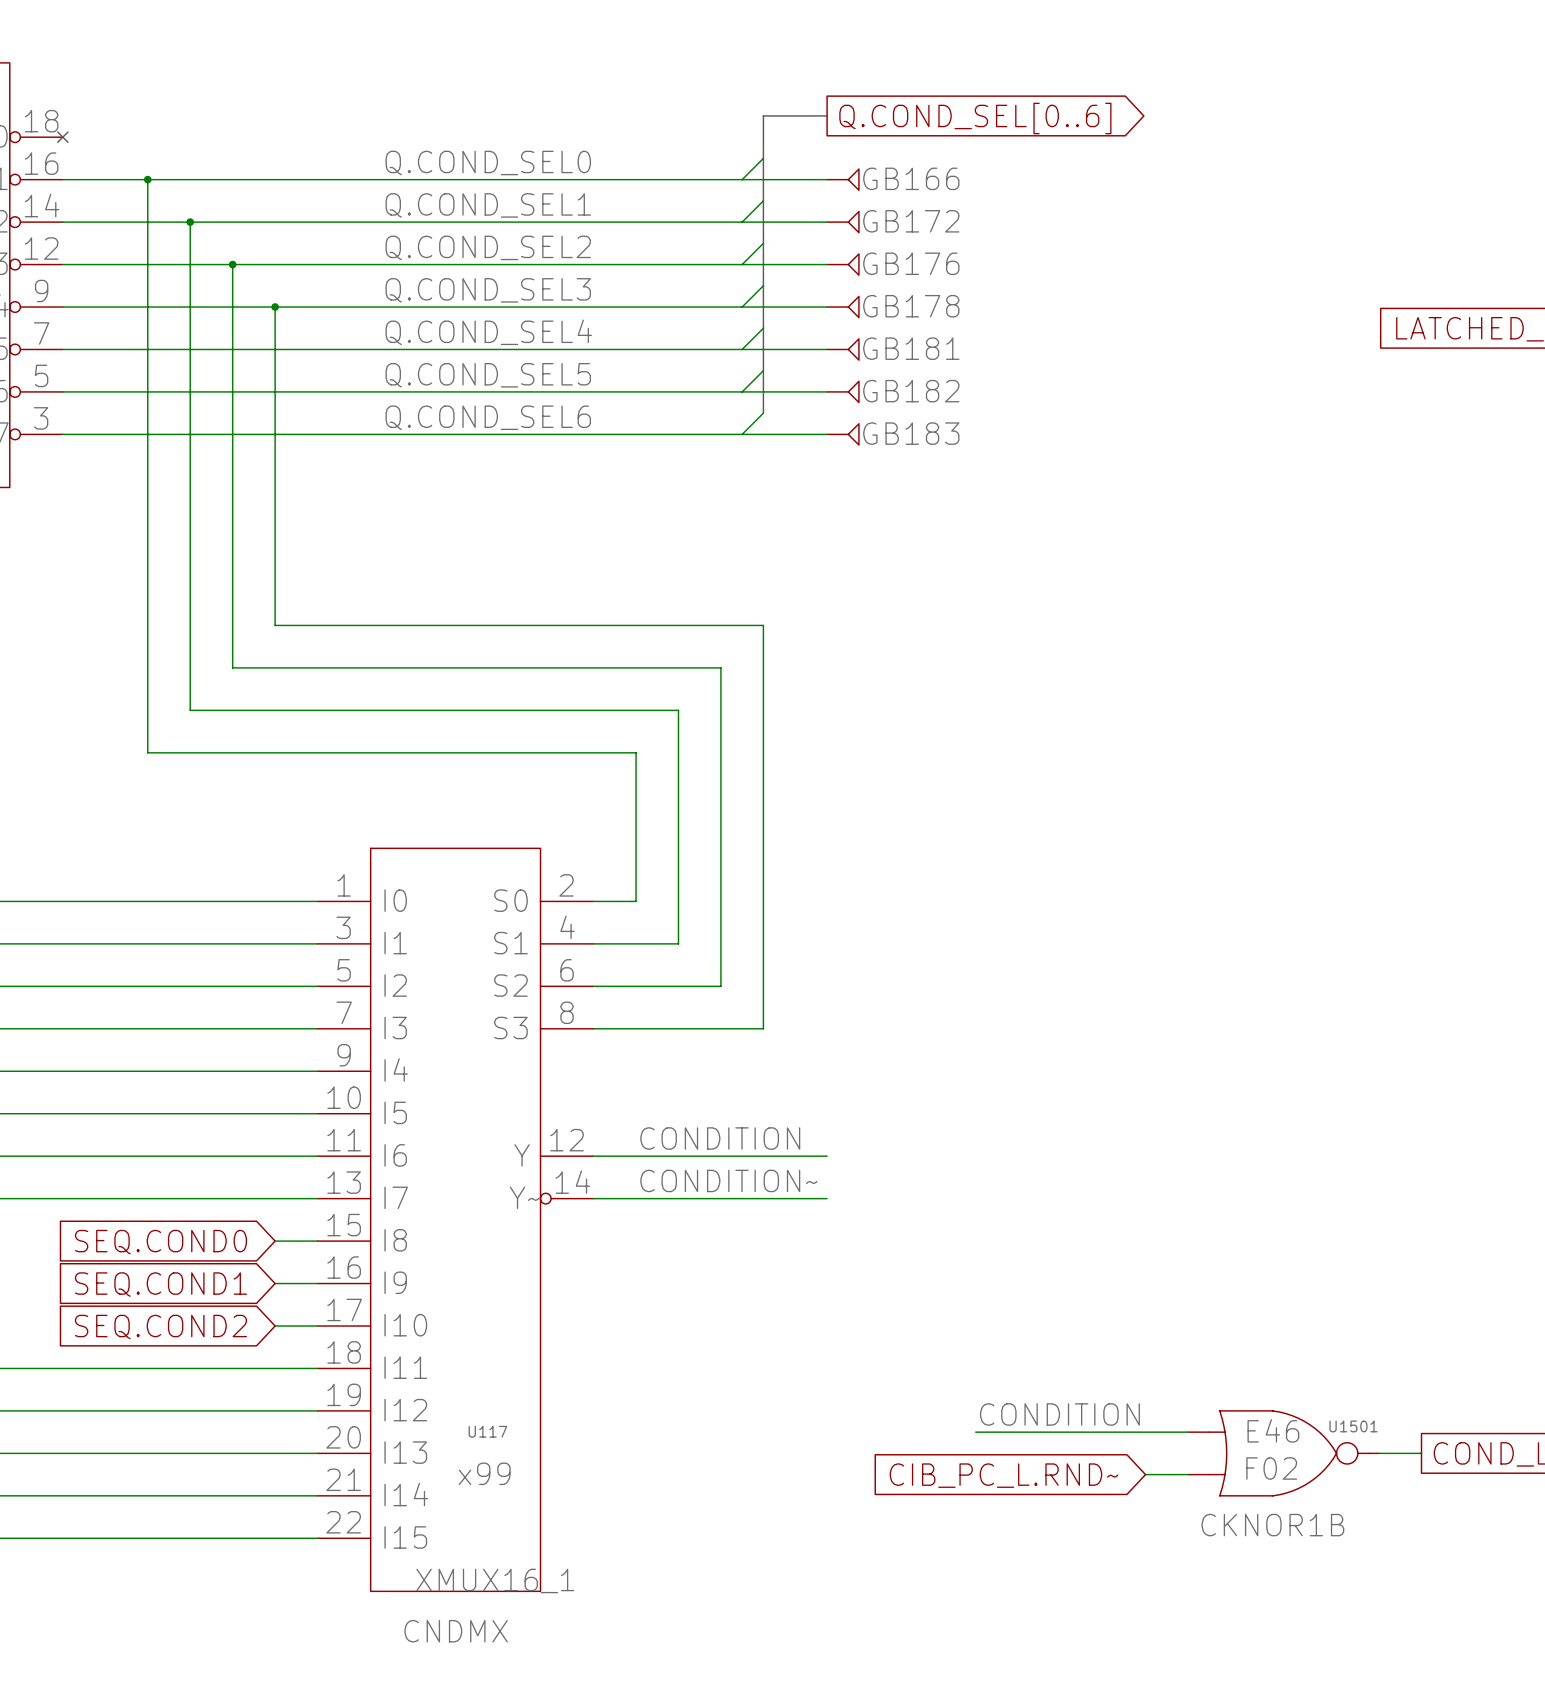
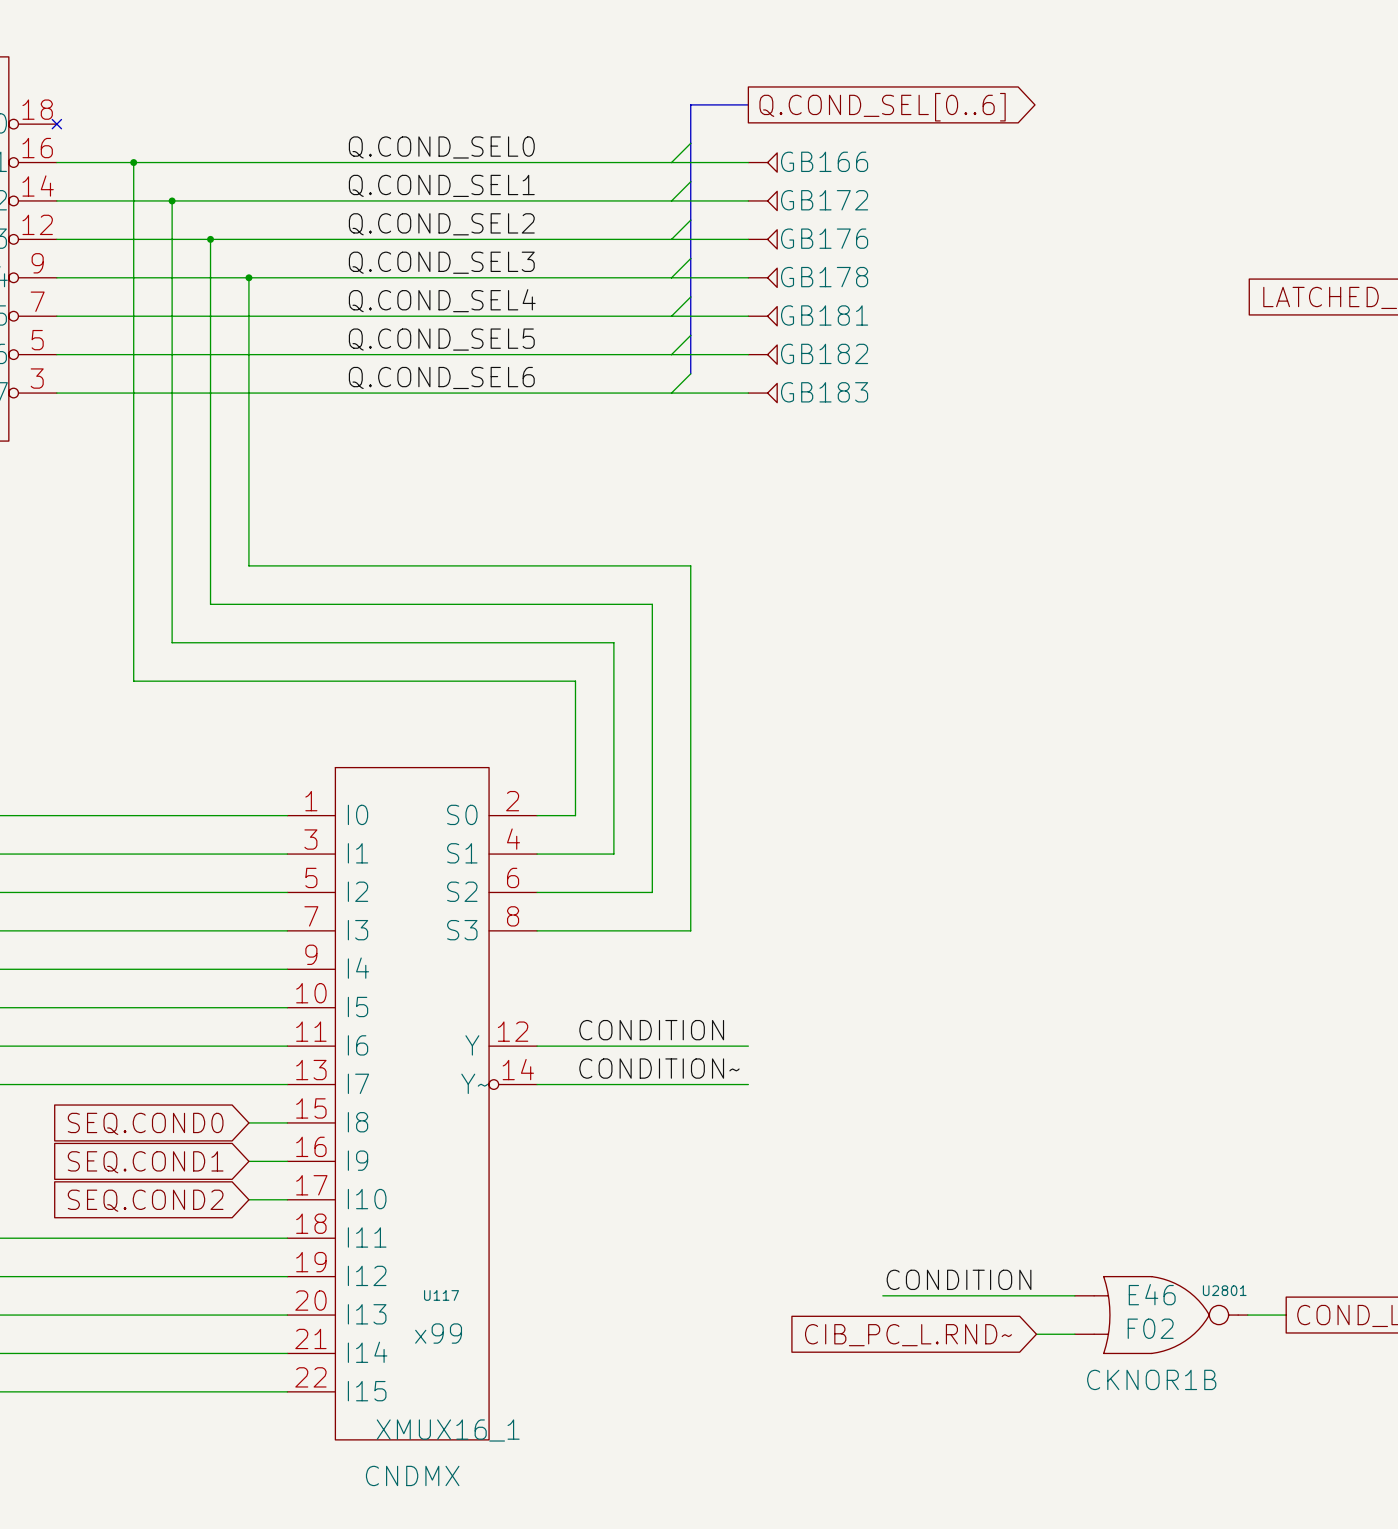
U1501 name: U1501 (1353, 1426) -> U2801 (1224, 1290)

